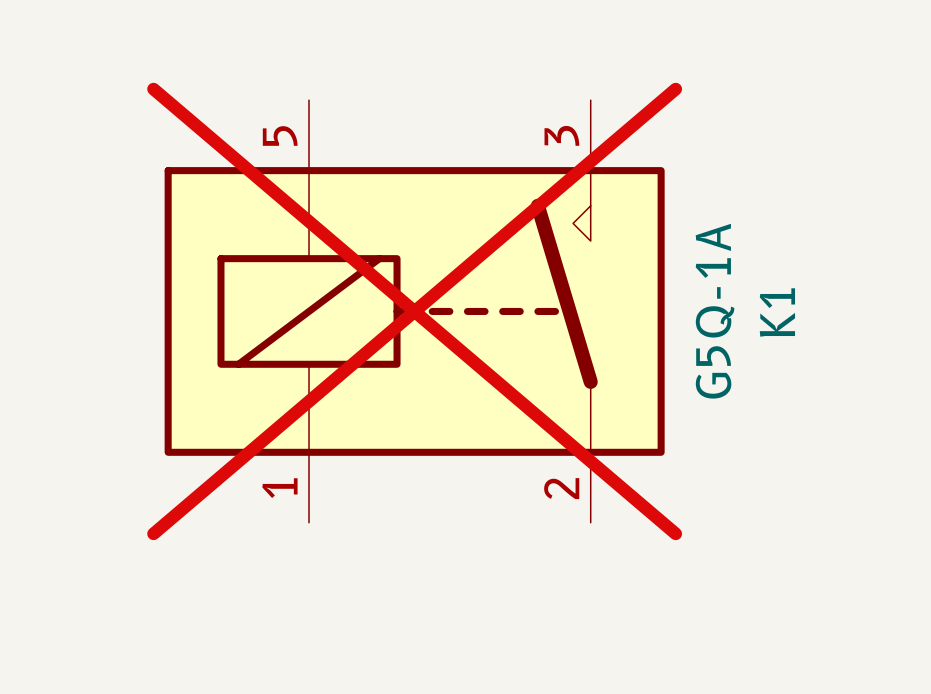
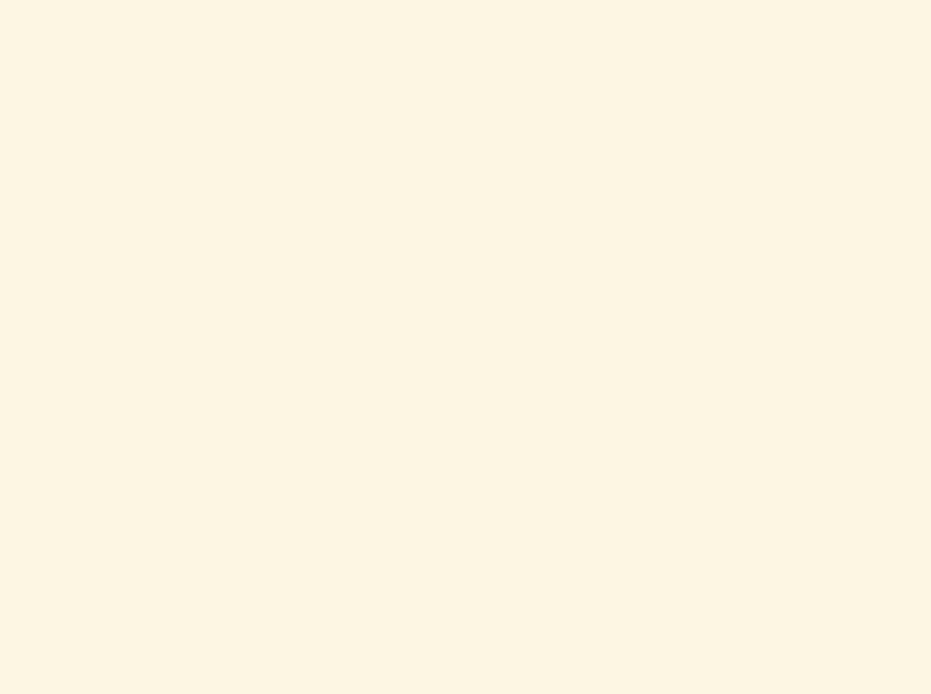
K1: G5Q-1A (414, 311) -> none

